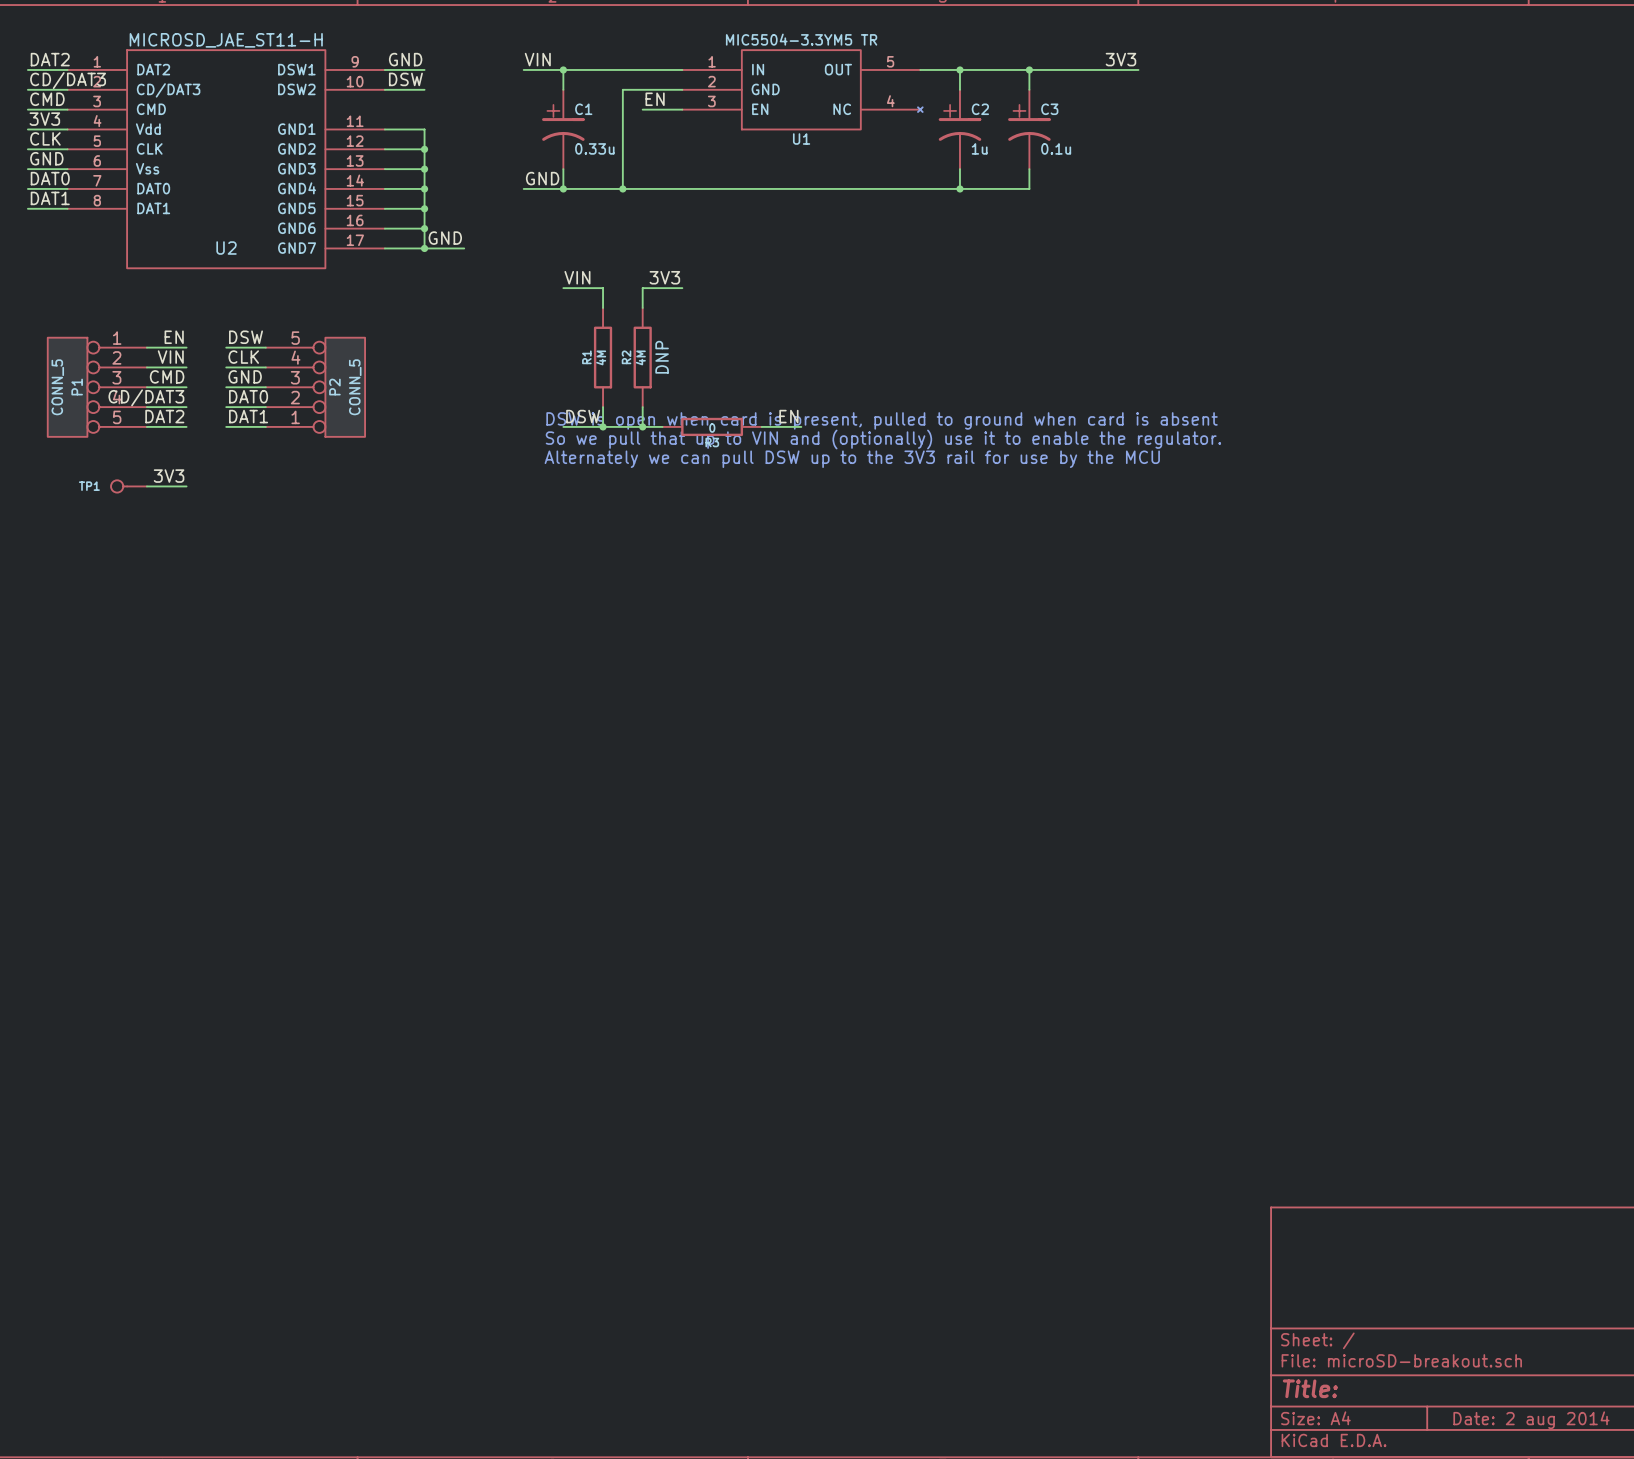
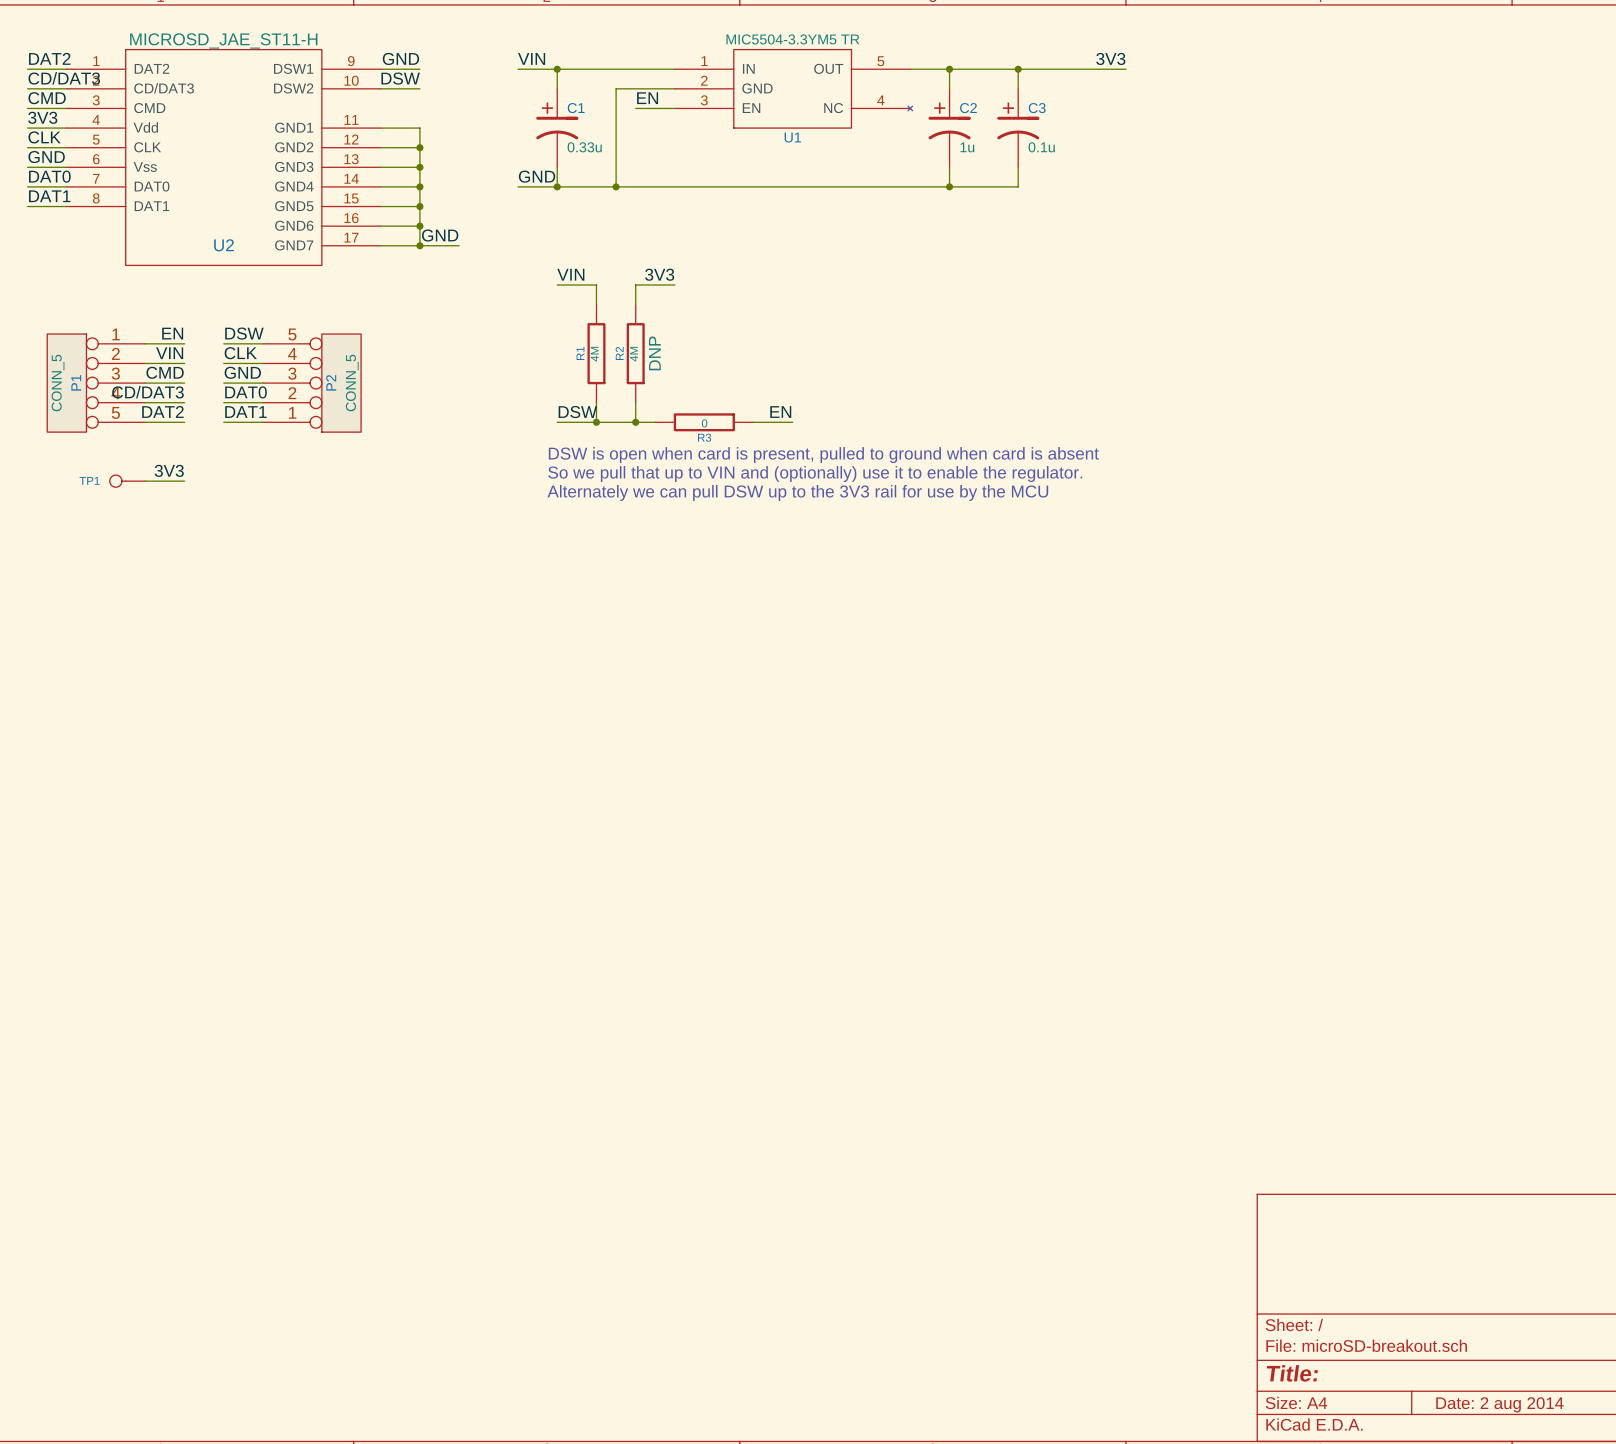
text position: DSW is open when card is present, pulled to ground when card is absent (882, 420) -> DSW is open when card is present, pulled to ground when card is absent (823, 455)
text position: So we pull that up to VIN and (optionally) use it to enable the regulator. (883, 439) -> So we pull that up to VIN and (optionally) use it to enable the regulator. (815, 474)
text position: Alternately we can pull DSW up to the 3V3 rail for use by the MCU (852, 459) -> Alternately we can pull DSW up to the 3V3 rail for use by the MCU (797, 492)

